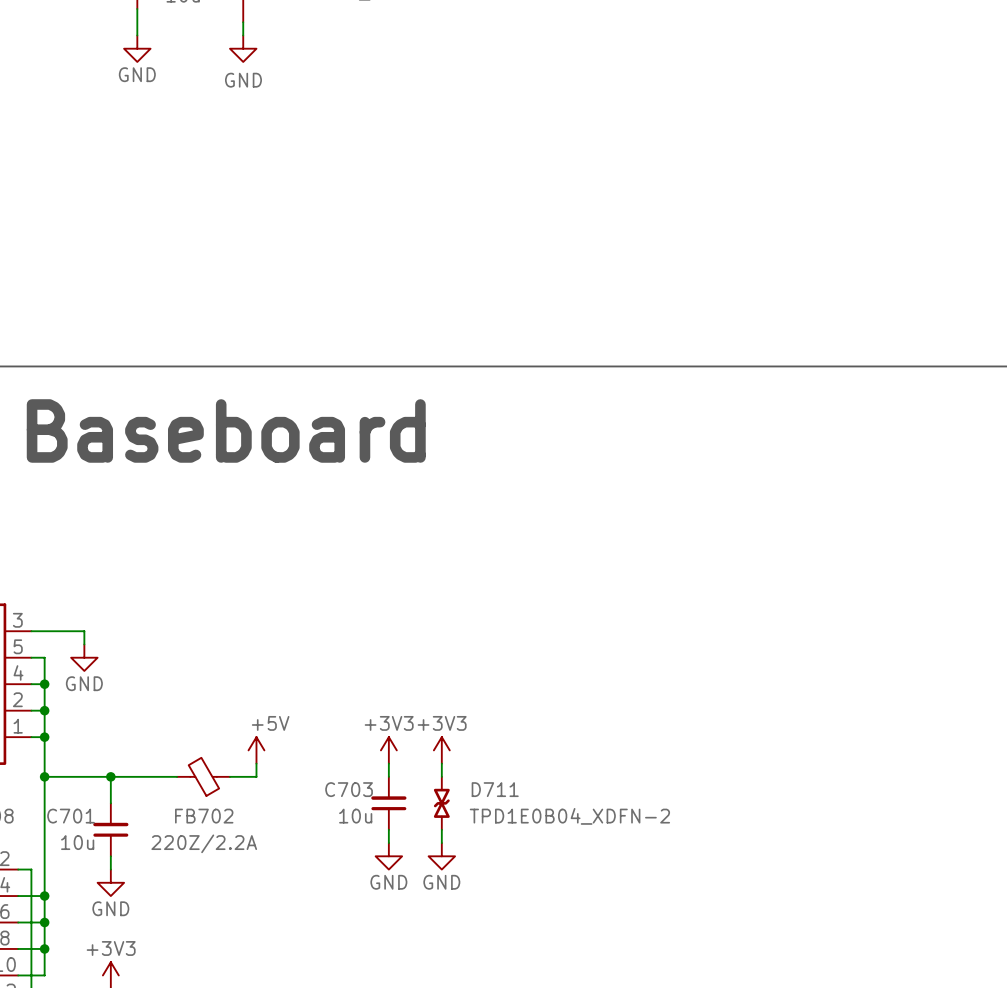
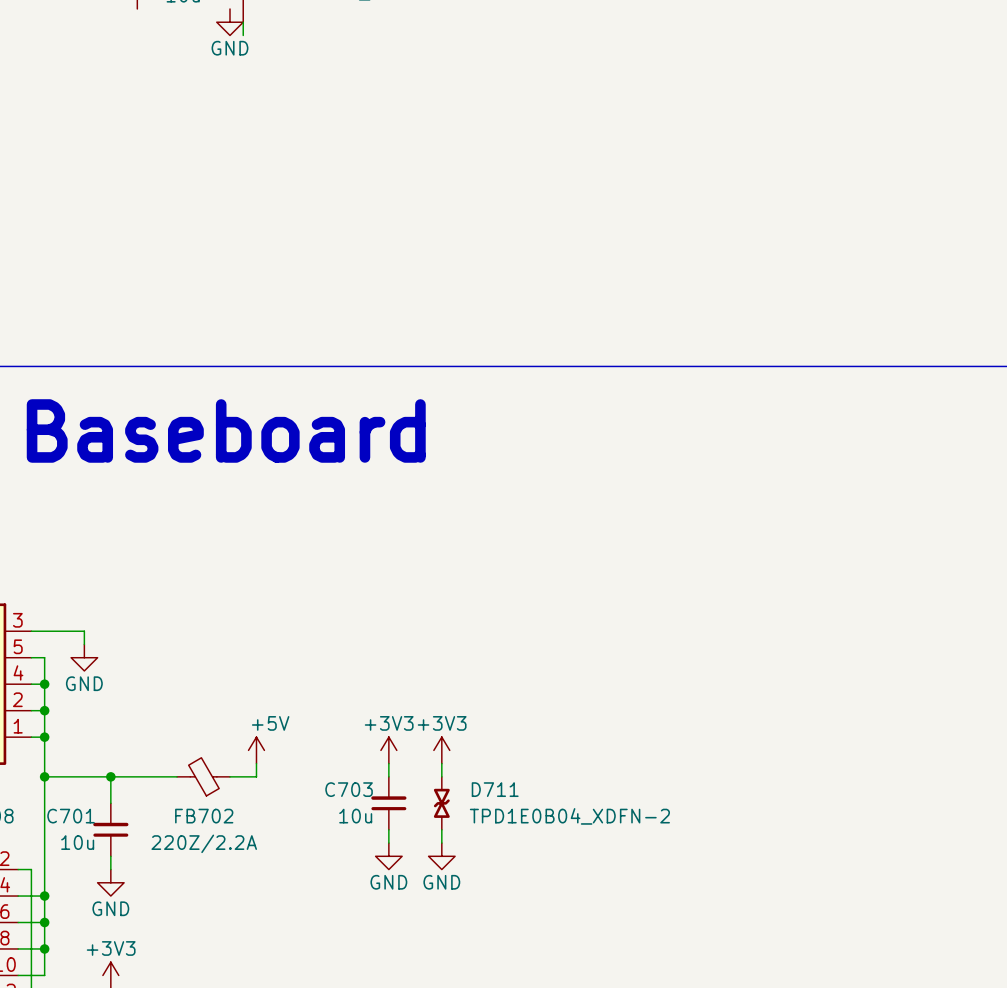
wire: (137, 8) (137, 35) -> none
power symbol: GND (137, 48) -> none
power symbol position: GND (243, 48) -> GND (230, 22)
power symbol text position: GND (243, 80) -> GND (230, 48)

